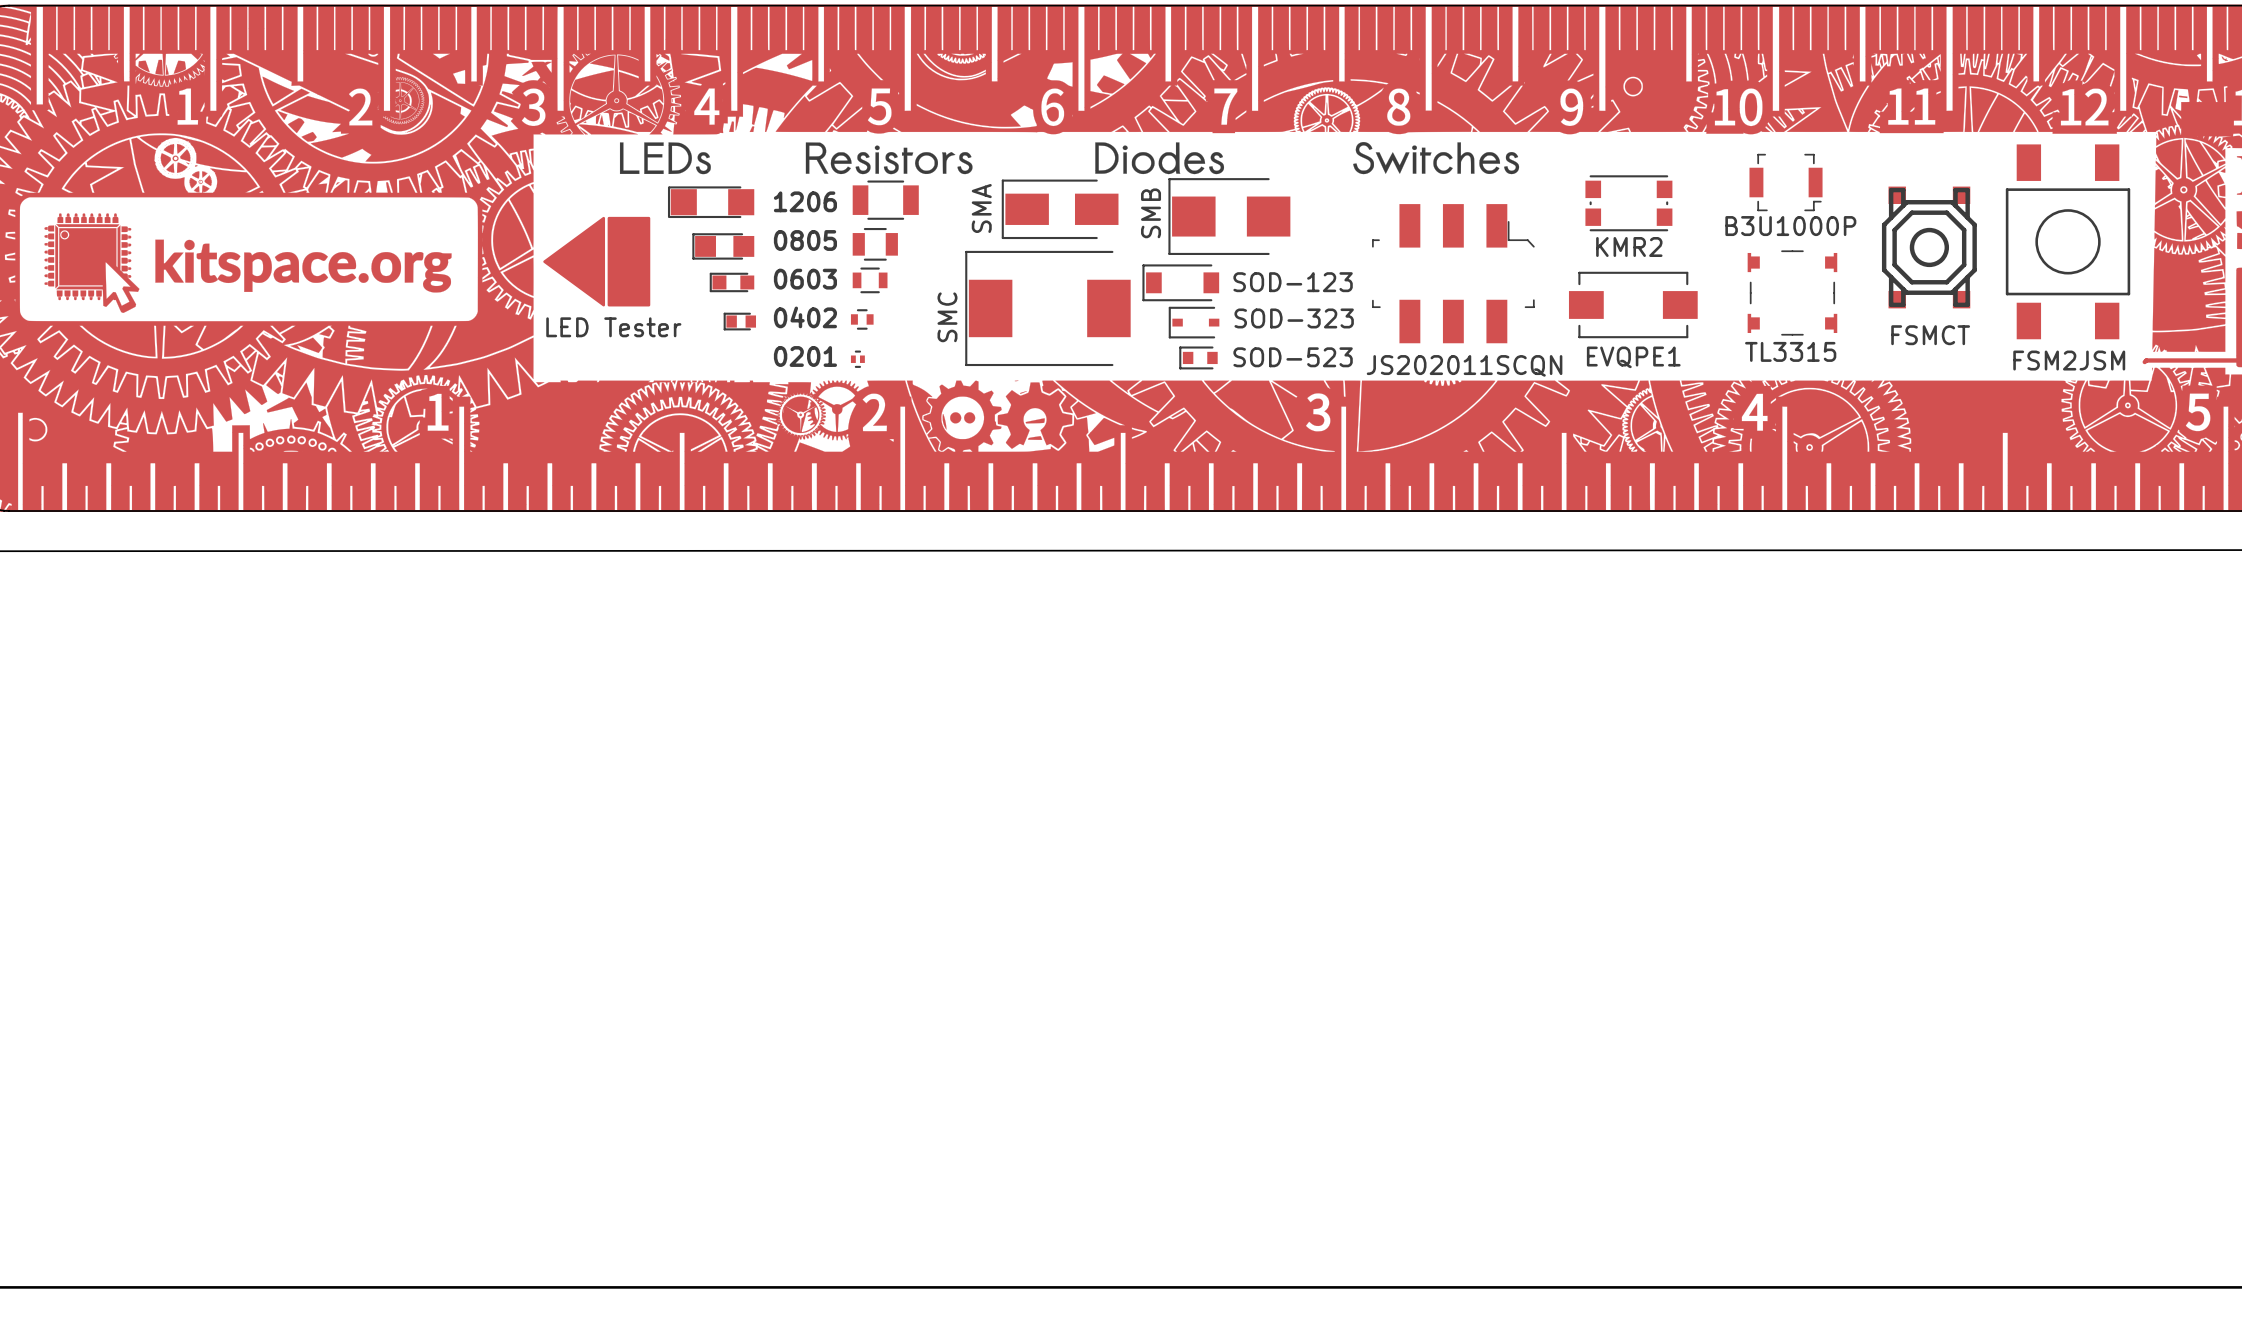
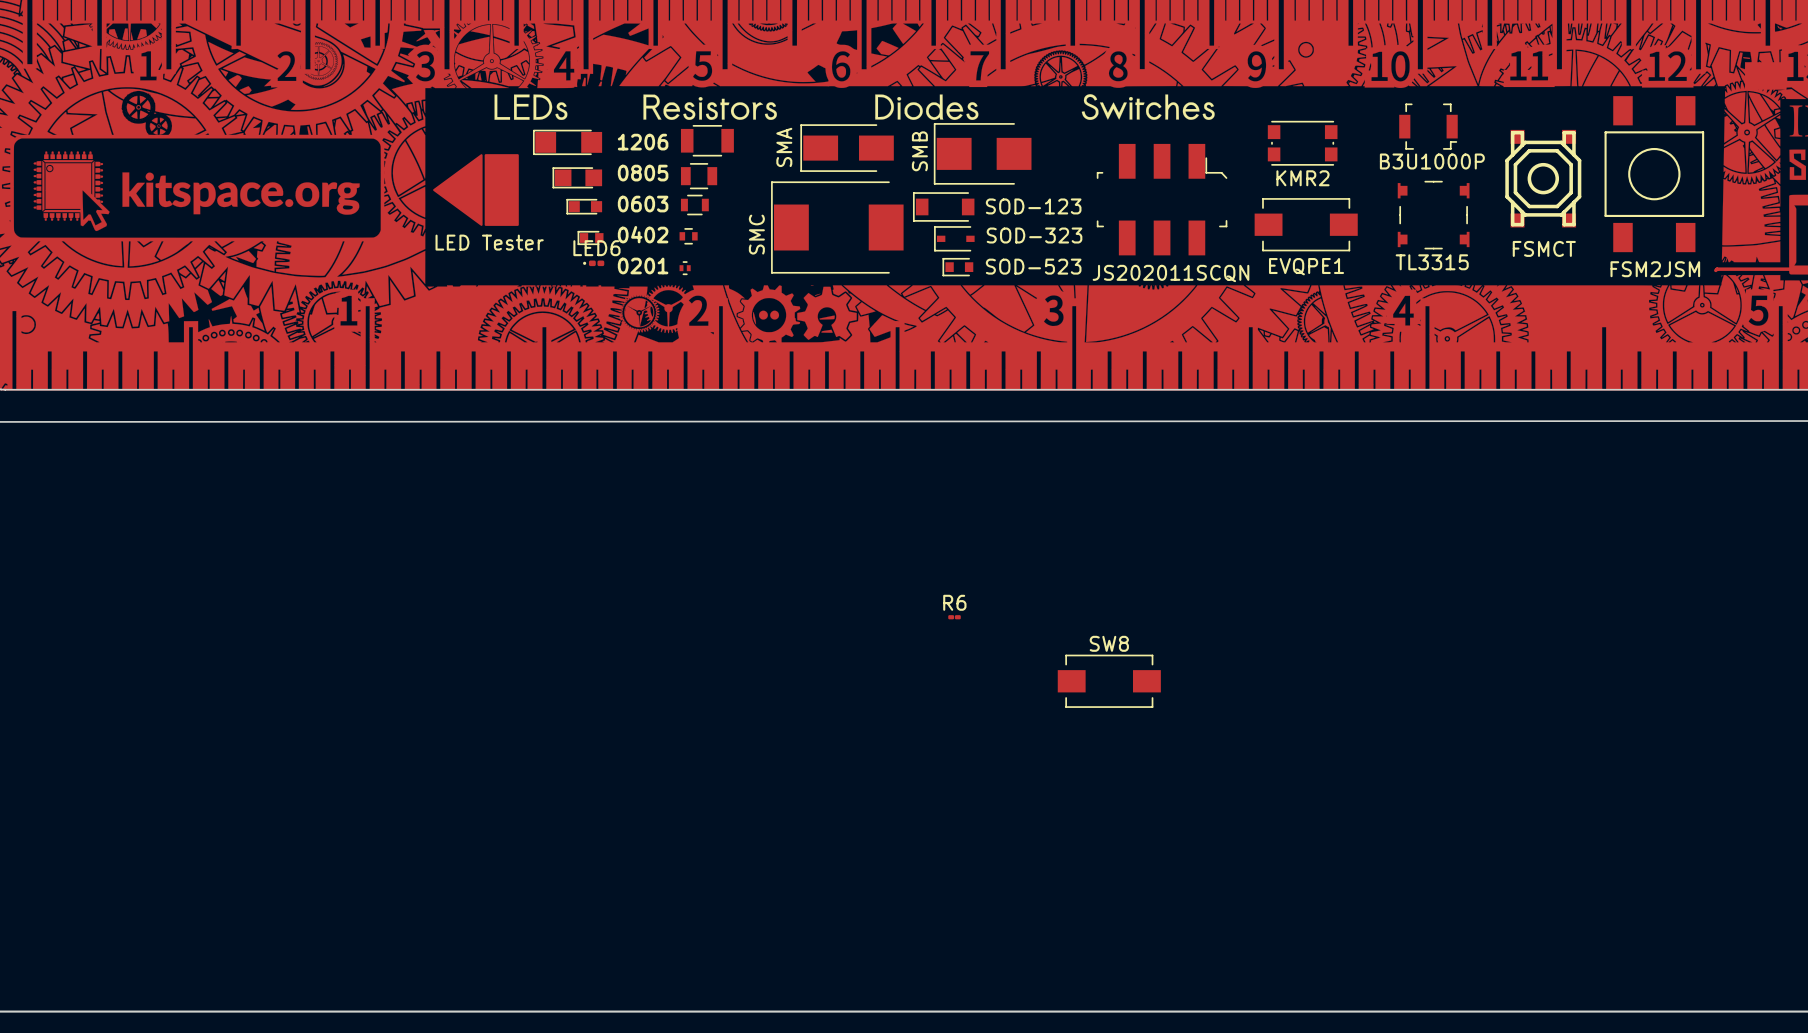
LED6: none -> (593, 263)
R6: none -> (954, 617)
SW8: none -> (1109, 681)

